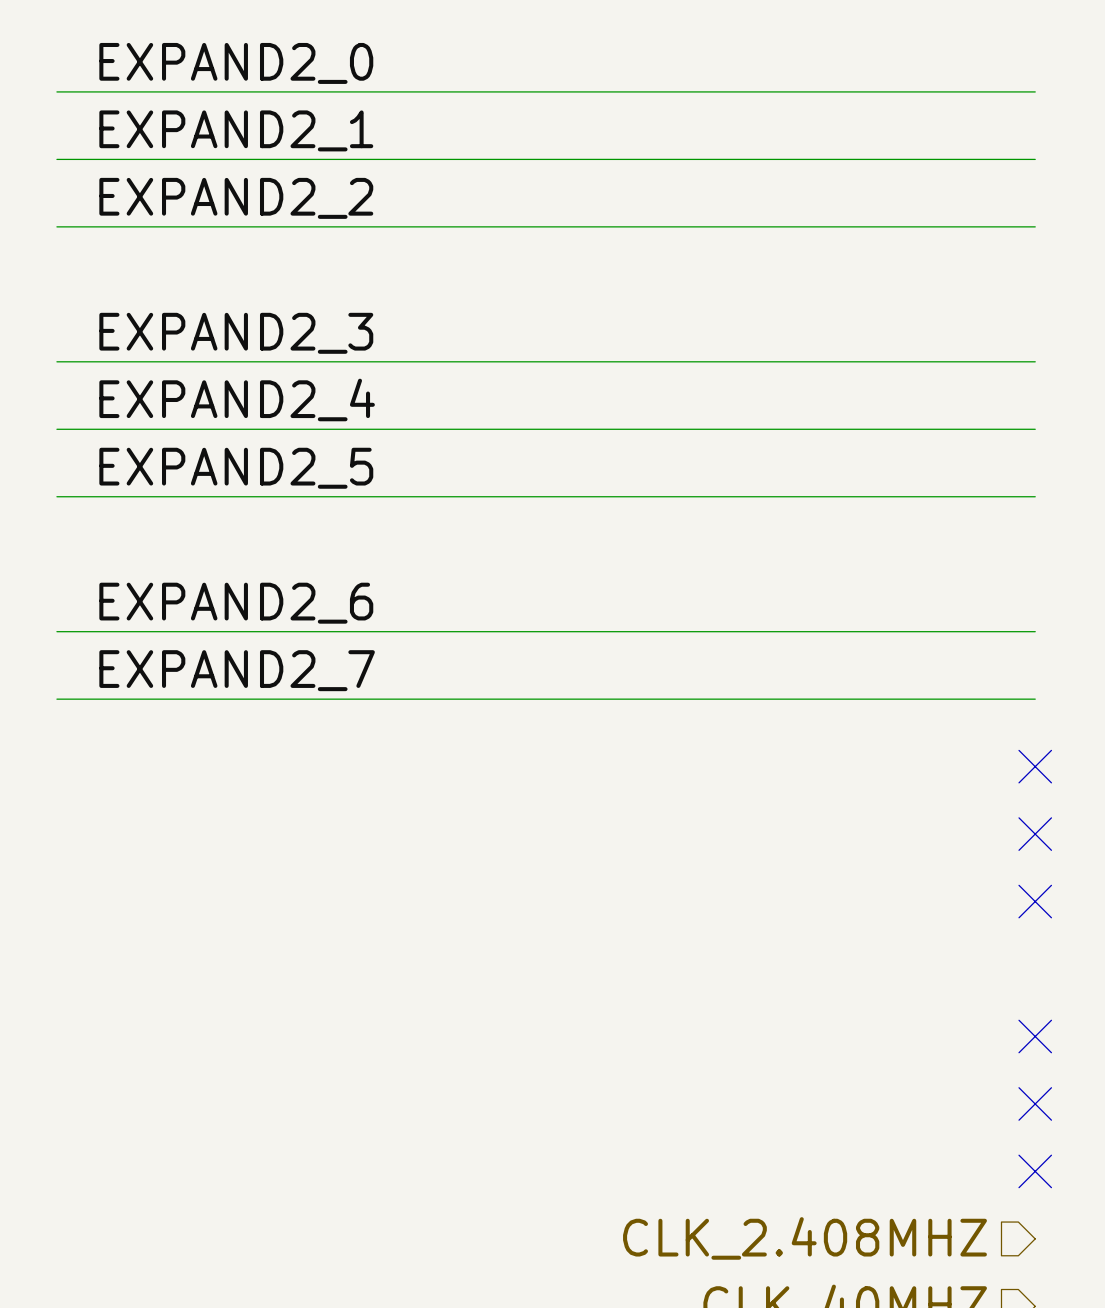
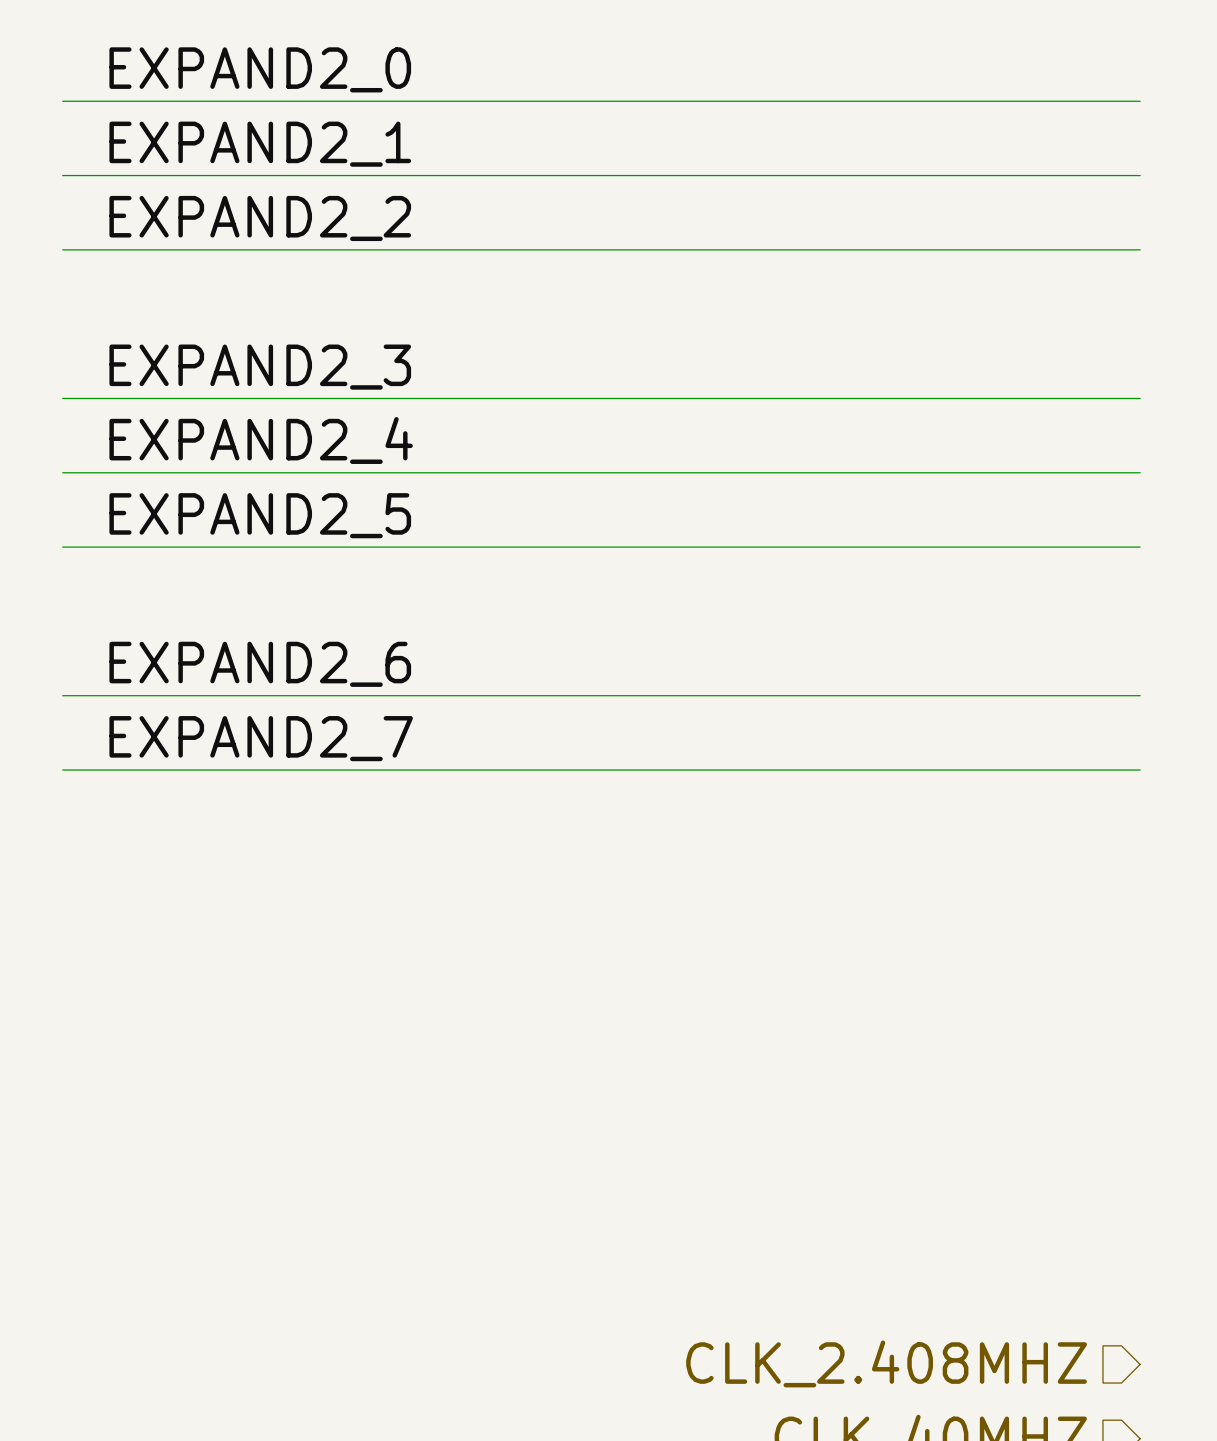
no-connect mark: (1035, 766) -> none
no-connect mark: (1035, 834) -> none
no-connect mark: (1035, 901) -> none
no-connect mark: (1035, 1036) -> none
no-connect mark: (1035, 1103) -> none
no-connect mark: (1035, 1171) -> none

